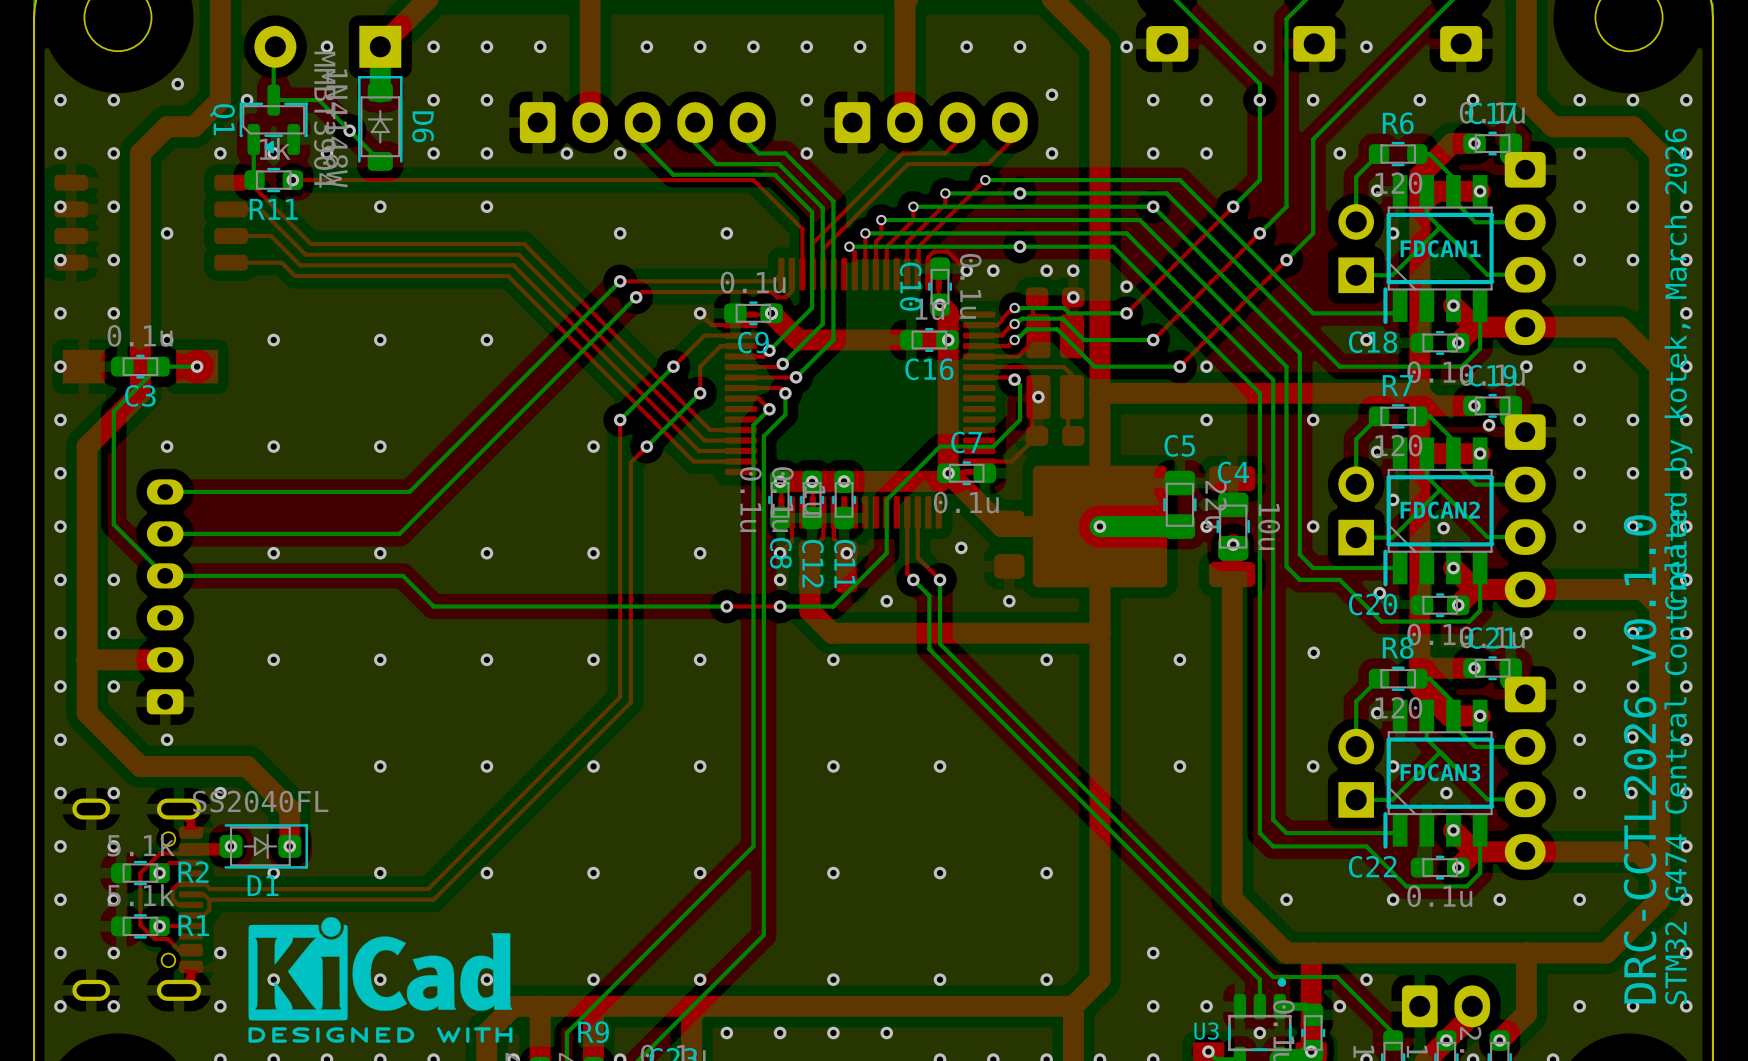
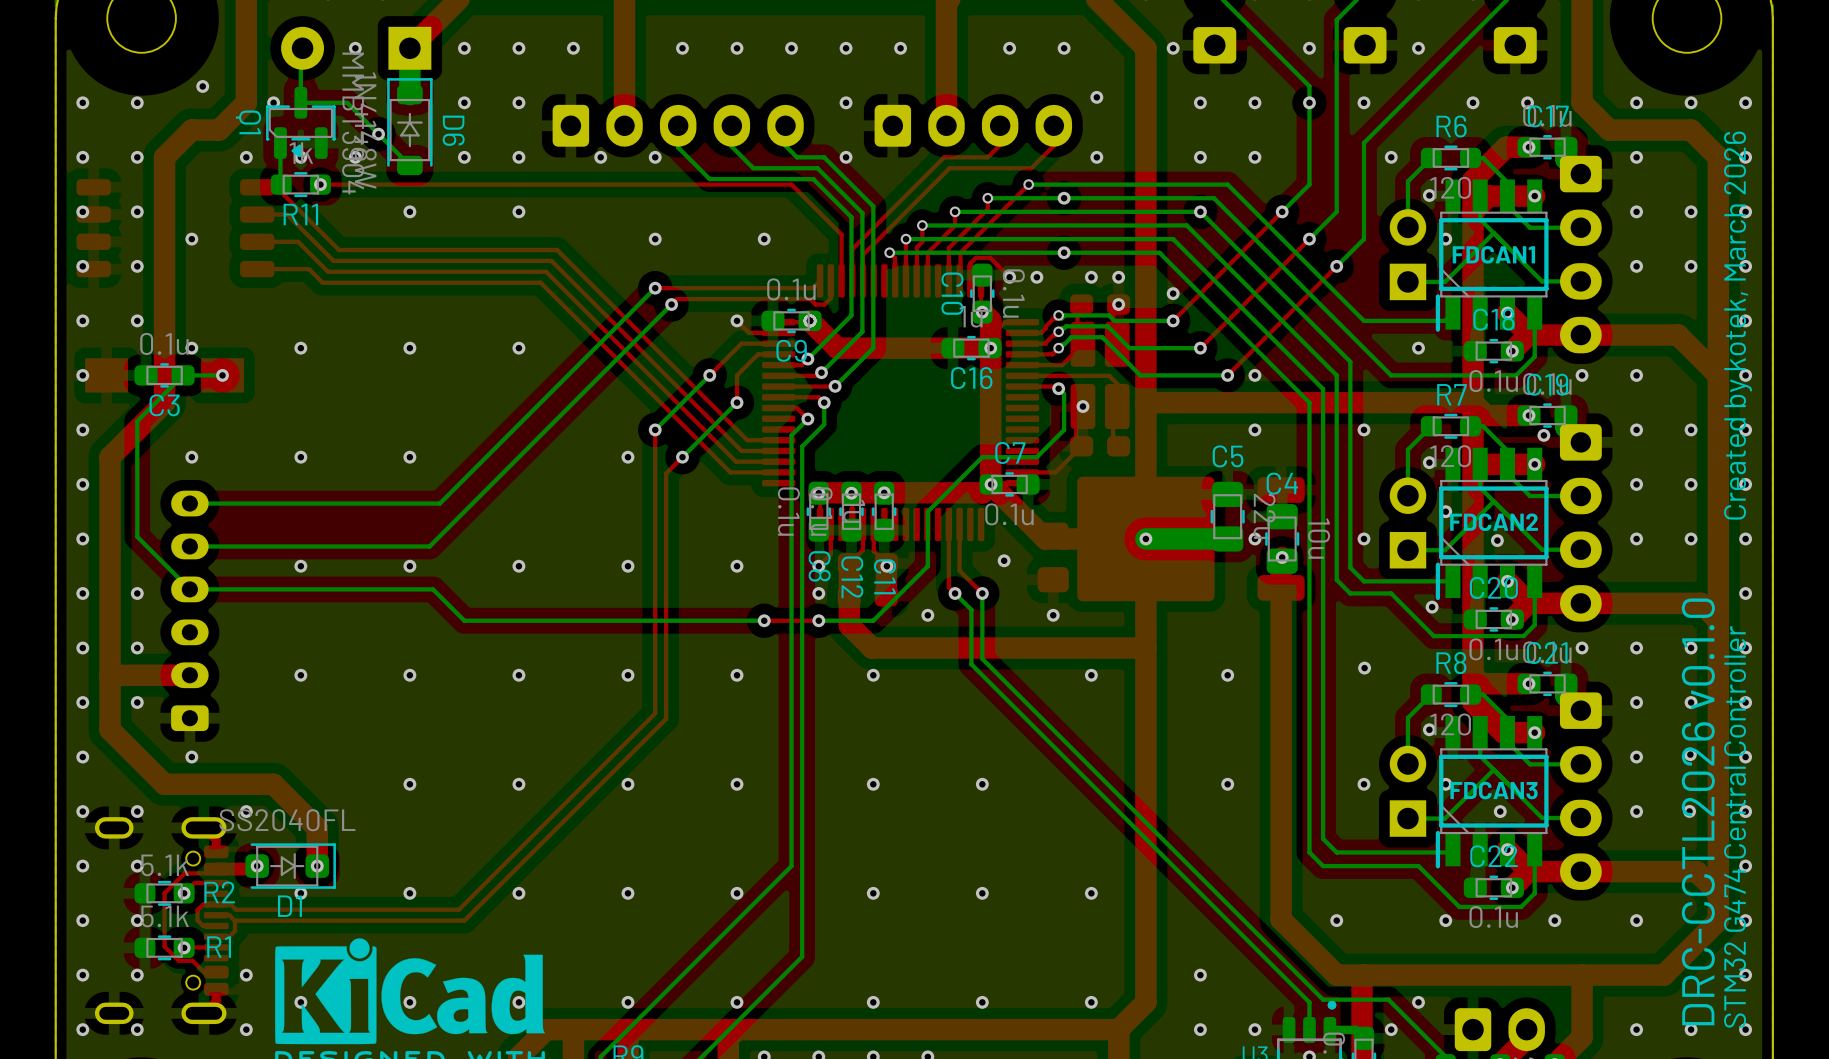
C18 name position: C18 (1373, 342) -> C18 (1494, 319)
C20 name position: C20 (1373, 604) -> C20 (1493, 587)
C22 name position: C22 (1372, 866) -> C22 (1494, 856)

